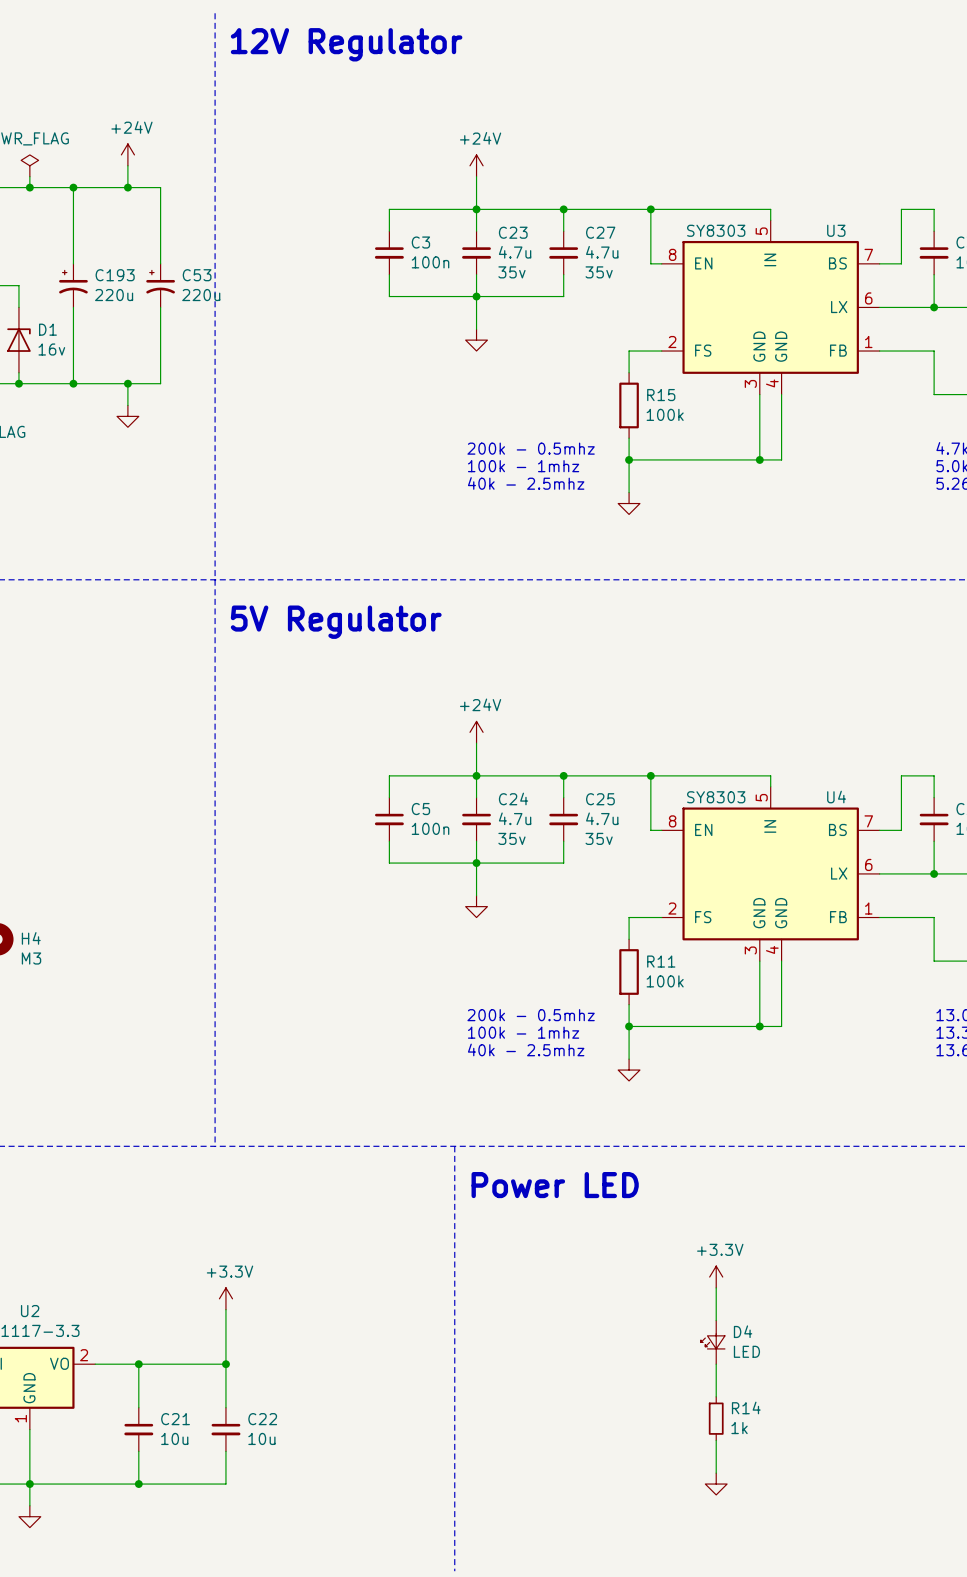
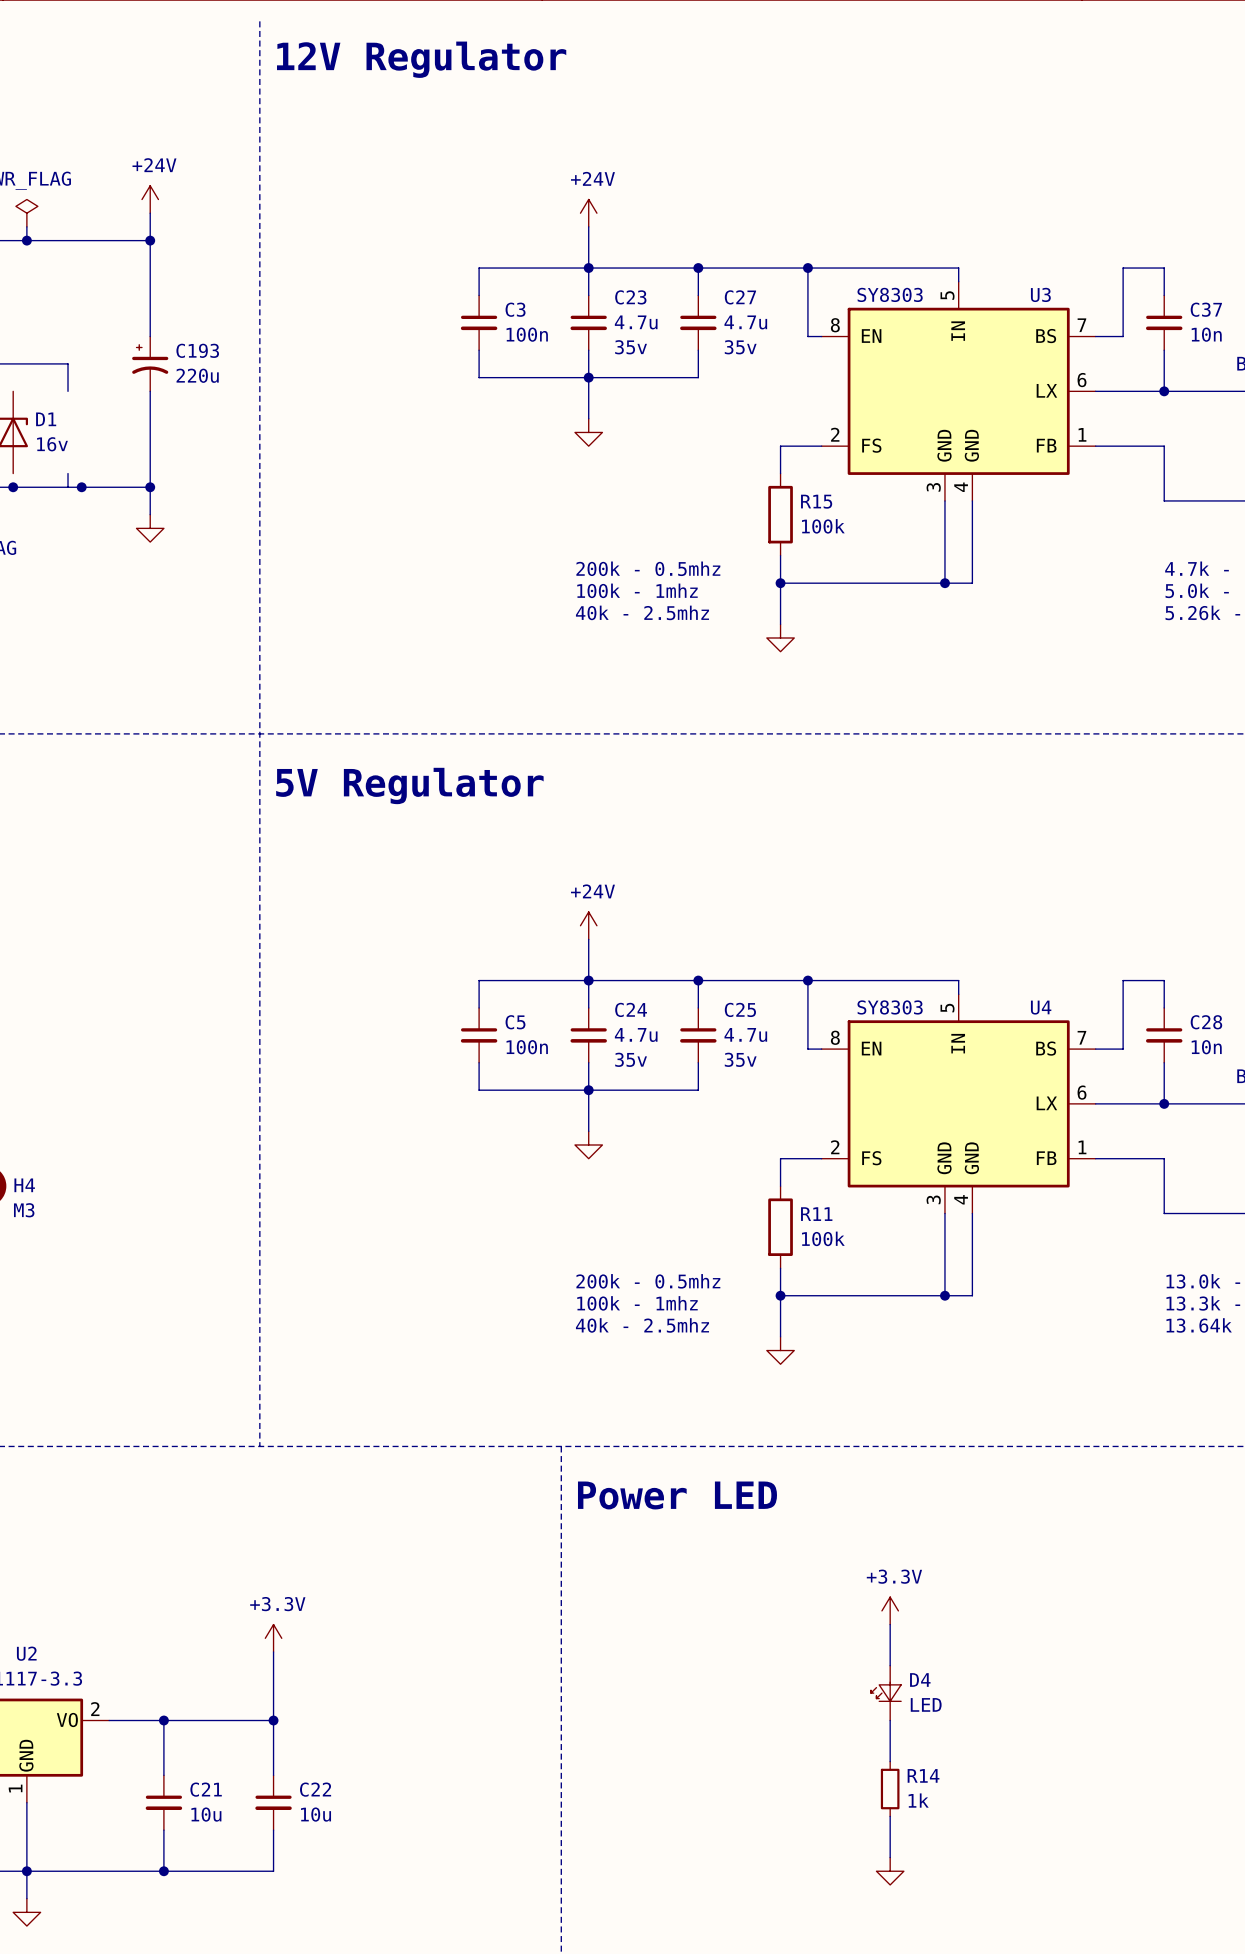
wire: (73, 187) (73, 263) -> none
junction: (73, 187) -> none
wire: (127, 187) (160, 187) (160, 263) -> (150, 240) (150, 336)
wire: (18, 285) (18, 307) -> (13, 363) (68, 363) (68, 391)
C193 position: (73, 285) -> (150, 363)
C53: 220u (160, 285) -> none
wire: (73, 307) (73, 383) -> none
wire: (160, 307) (160, 383) (127, 383) -> (150, 391) (150, 487)
wire: (18, 372) (18, 383) -> (68, 473) (68, 487)

